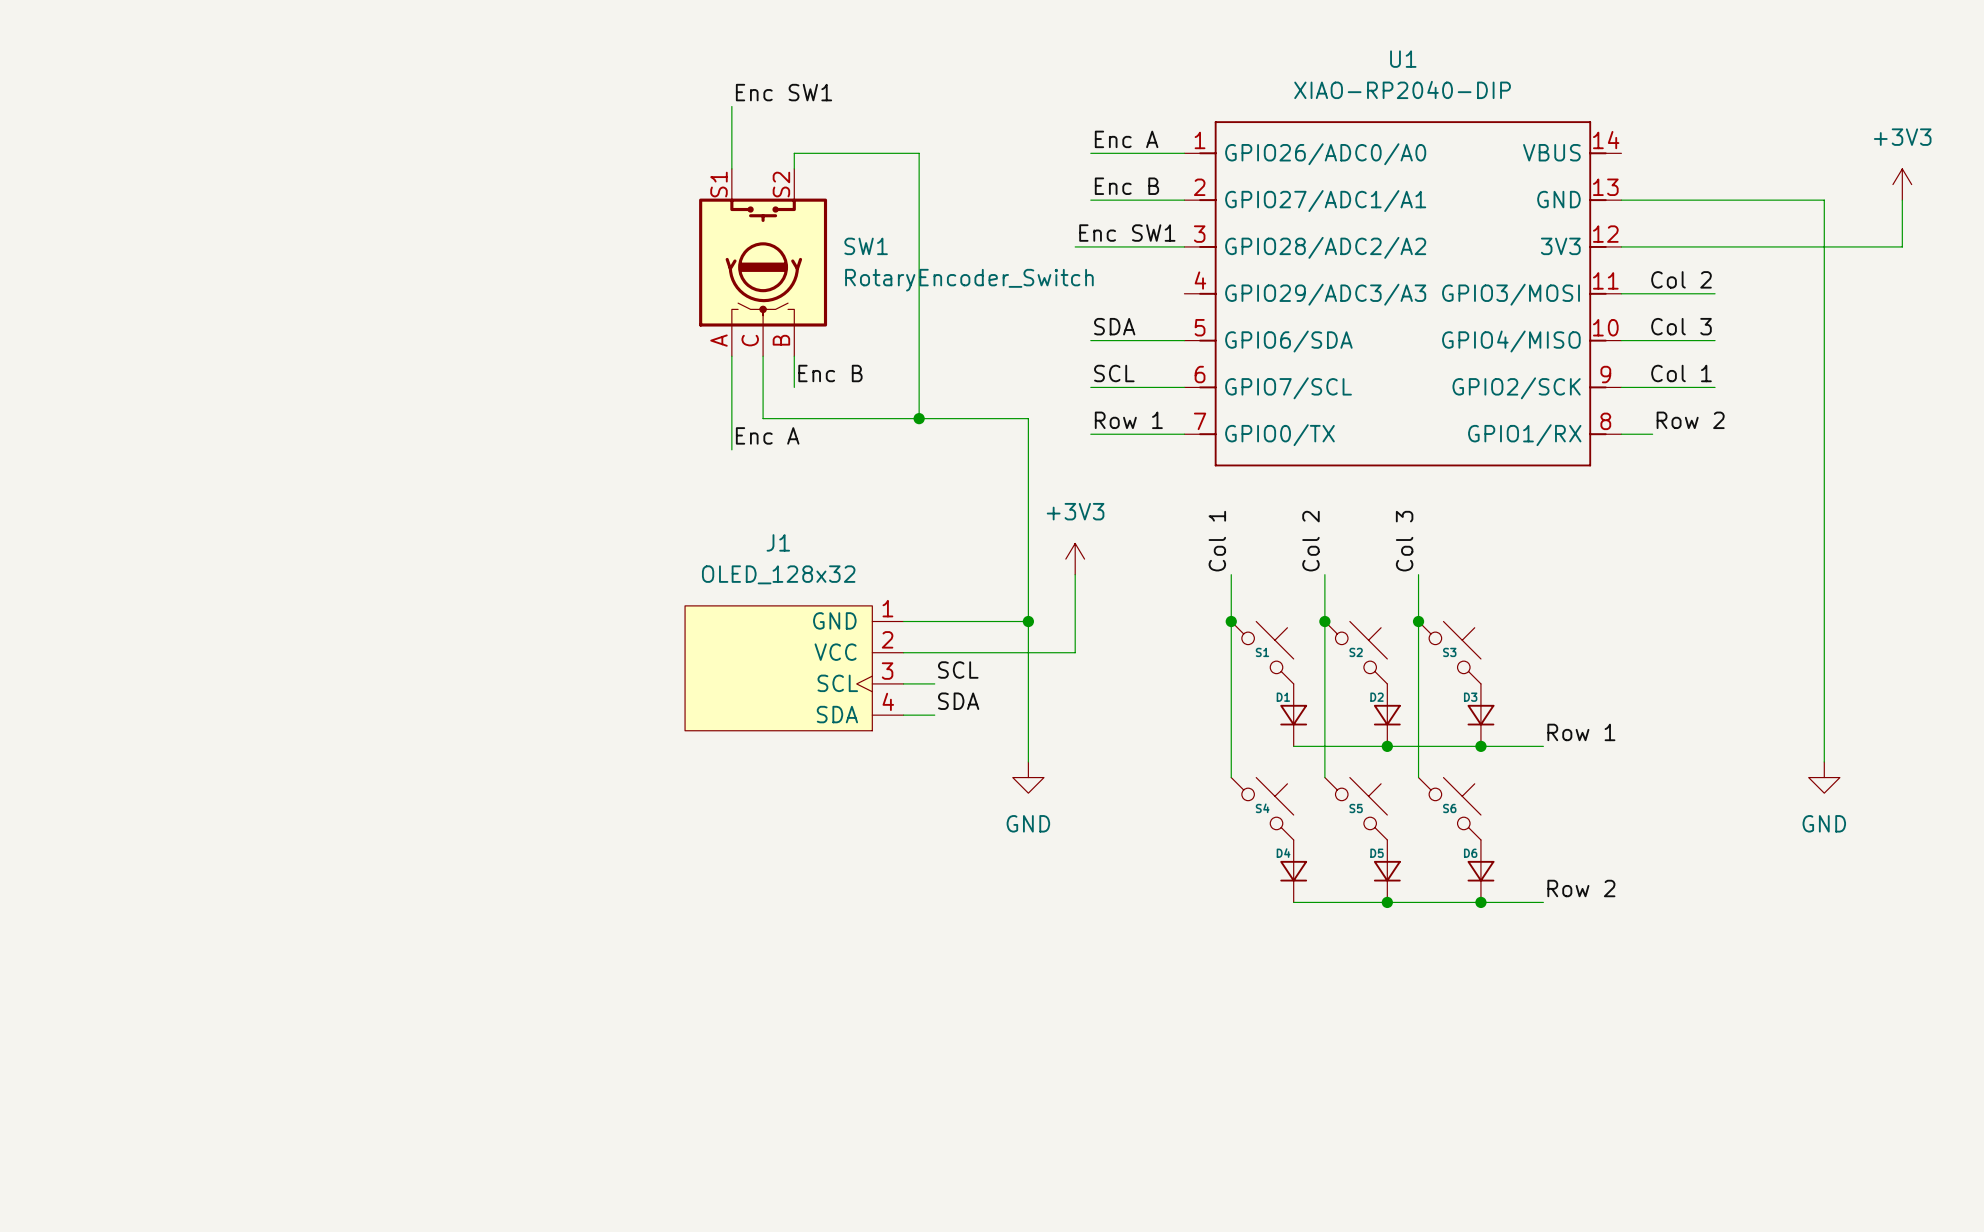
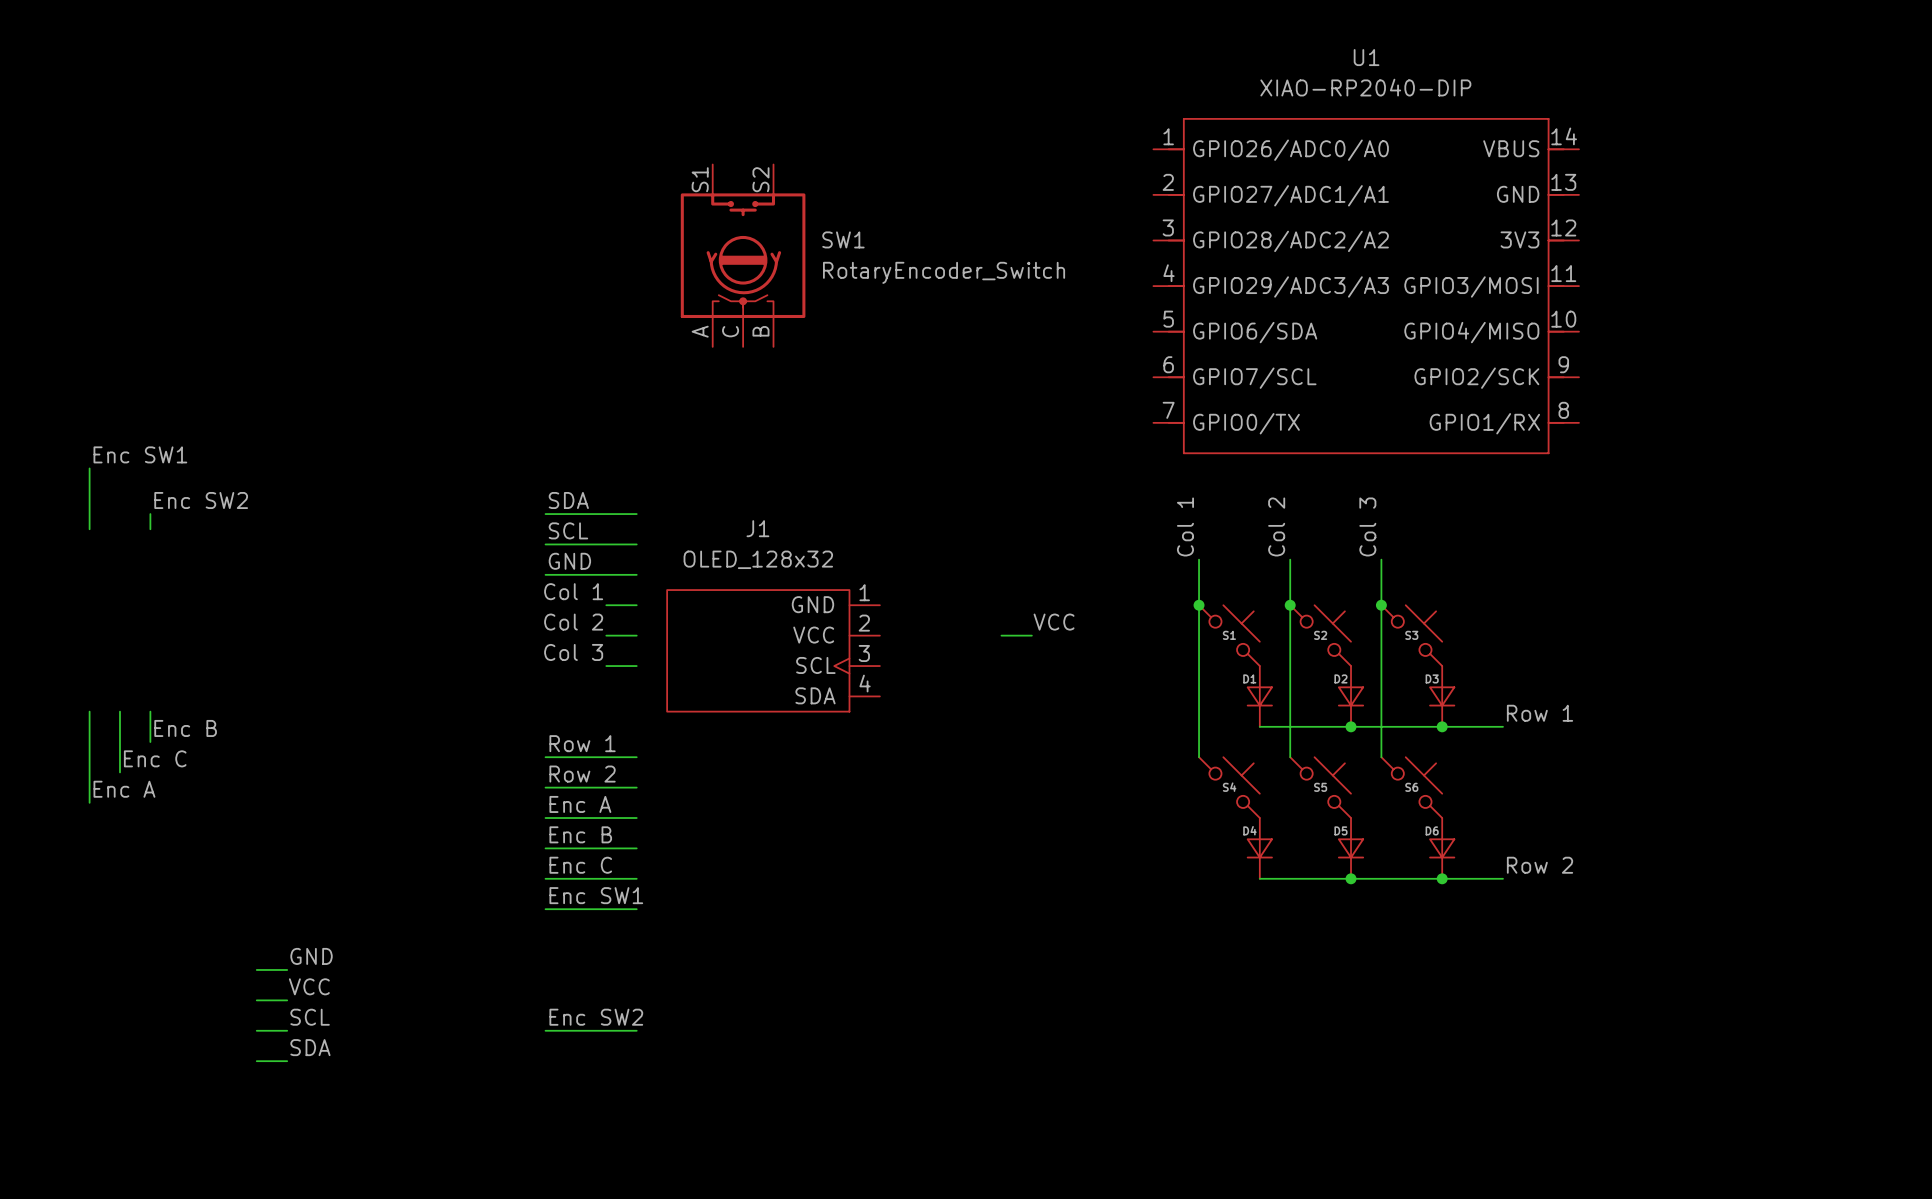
label: Enc SW1 (784, 92) -> none
wire: (731, 106) (731, 168) -> none
label: Enc A (1126, 139) -> none
wire: (1090, 153) (1184, 153) -> none
wire: (794, 168) (794, 153) (919, 153) (919, 418) -> none
power symbol: +3V3 (1902, 184) -> none
label: Enc B (1126, 186) -> none
wire: (1090, 200) (1184, 200) -> none
wire: (1621, 200) (1824, 200) (1824, 761) -> none
wire: (1902, 200) (1902, 246) (1621, 246) -> none
label: Enc SW1 (1127, 233) -> none
wire: (1075, 246) (1184, 246) -> none
label: Col 2 (1681, 279) -> none
wire: (1621, 293) (1715, 293) -> none
label: SDA (1114, 326) -> none
label: Col 3 (1681, 326) -> none
wire: (1090, 340) (1184, 340) -> none
wire: (1621, 340) (1715, 340) -> none
wire: (731, 356) (731, 449) -> none
wire: (763, 356) (763, 418) (1028, 418) (1028, 761) -> none
wire: (794, 356) (794, 387) -> none
label: Enc B (830, 373) -> none
label: SCL (1114, 373) -> none
label: Col 1 (1681, 373) -> none
wire: (1090, 387) (1184, 387) -> none
wire: (1621, 387) (1715, 387) -> none
junction: (919, 418) -> none
label: Row 1 (1128, 420) -> none
label: Row 2 (1690, 420) -> none
wire: (1090, 434) (1184, 434) -> none
wire: (1621, 434) (1652, 434) -> none
label: Enc A (767, 435) -> none
label: none -> Enc SW1 (140, 454)
wire: none -> (89, 468) (89, 529)
label: none -> Enc SW2 (201, 500)
label: none -> SDA (568, 500)
wire: none -> (150, 514) (150, 529)
wire: none -> (545, 514) (636, 514)
label: none -> SCL (568, 530)
wire: none -> (545, 544) (636, 544)
power symbol: +3V3 (1075, 559) -> none
wire: (1075, 574) (1075, 652) (1059, 652) -> none
label: none -> GND (569, 561)
wire: none -> (545, 574) (636, 574)
label: none -> Col 1 (573, 591)
wire: none -> (606, 605) (636, 605)
wire: (903, 621) (1028, 621) -> none
junction: (1028, 621) -> none
label: none -> Col 2 (573, 622)
label: none -> VCC (1054, 622)
wire: (903, 652) (1028, 652) -> none
label: none -> Col 3 (573, 652)
label: SCL (958, 670) -> none
wire: (903, 683) (934, 683) -> (606, 635) (636, 635)
label: SDA (958, 701) -> none
wire: (903, 715) (934, 715) -> (606, 666) (636, 666)
wire: none -> (89, 711) (89, 802)
wire: none -> (120, 711) (120, 772)
wire: none -> (150, 711) (150, 742)
label: none -> Enc B (185, 728)
label: none -> Row 1 (582, 743)
wire: none -> (545, 757) (636, 757)
power symbol: GND (1028, 777) -> none
power symbol: GND (1824, 777) -> none
label: none -> Enc C (155, 758)
label: none -> Row 2 (582, 774)
wire: none -> (545, 787) (636, 787)
label: none -> Enc A (124, 789)
label: none -> Enc A (580, 804)
wire: none -> (545, 818) (636, 818)
label: none -> Enc B (580, 834)
wire: none -> (545, 848) (636, 848)
label: none -> Enc C (580, 865)
wire: none -> (545, 878) (636, 878)
label: none -> Enc SW1 (596, 895)
wire: none -> (545, 909) (636, 909)
label: none -> GND (311, 956)
wire: none -> (256, 969) (287, 969)
label: none -> VCC (309, 986)
wire: none -> (256, 1000) (287, 1000)
label: none -> SCL (310, 1017)
label: none -> Enc SW2 (596, 1017)
wire: none -> (256, 1030) (287, 1030)
wire: none -> (545, 1030) (636, 1030)
label: none -> SDA (310, 1047)
wire: none -> (256, 1061) (287, 1061)

